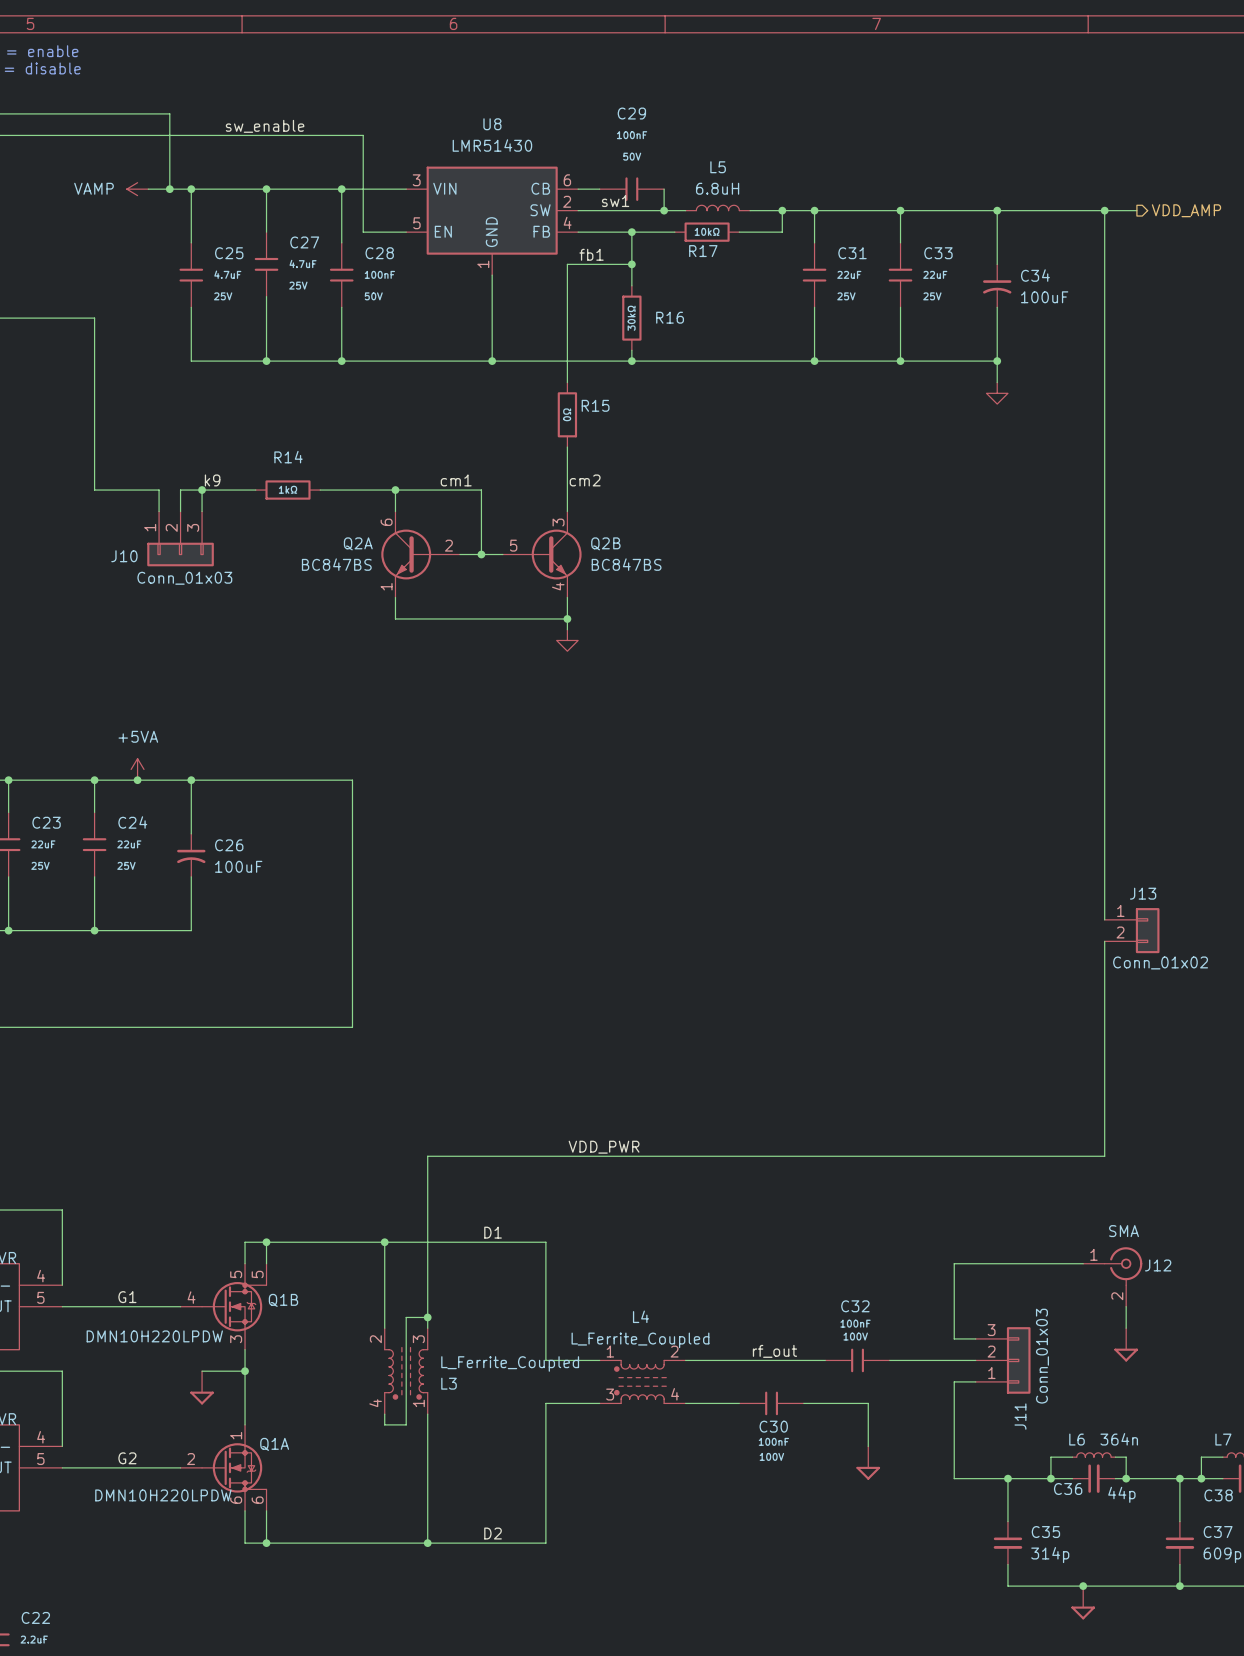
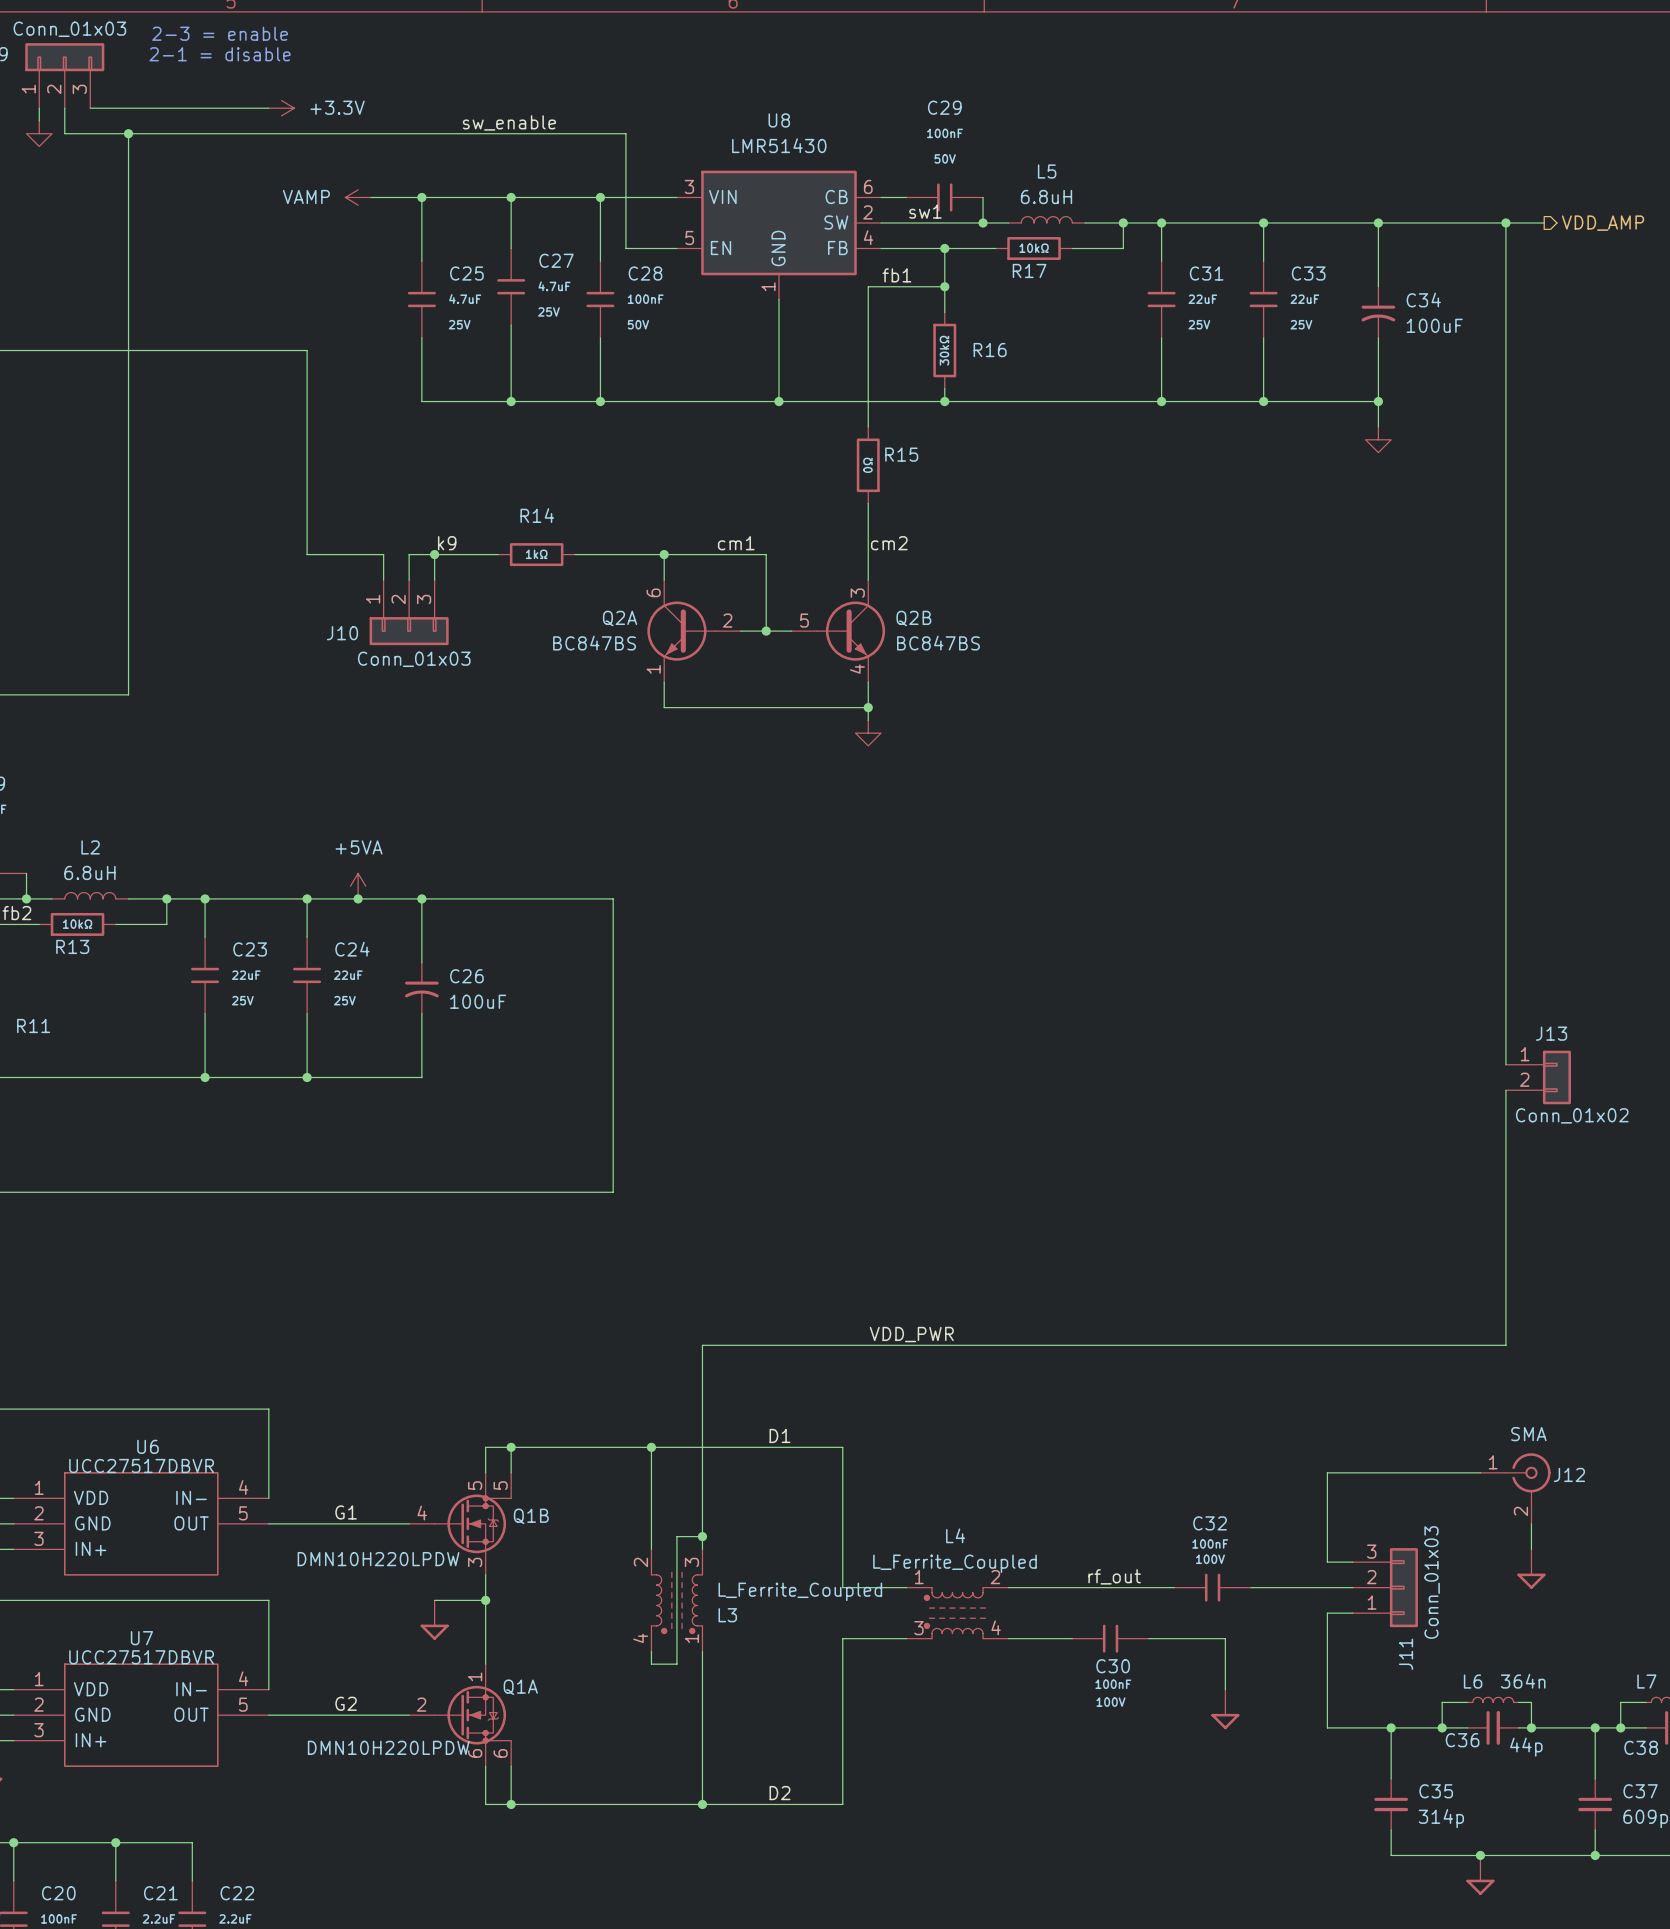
wire: (62, 113) (169, 113) (169, 189) -> none
power symbol: none -> +3.3V (281, 108)
junction: (169, 189) -> none

